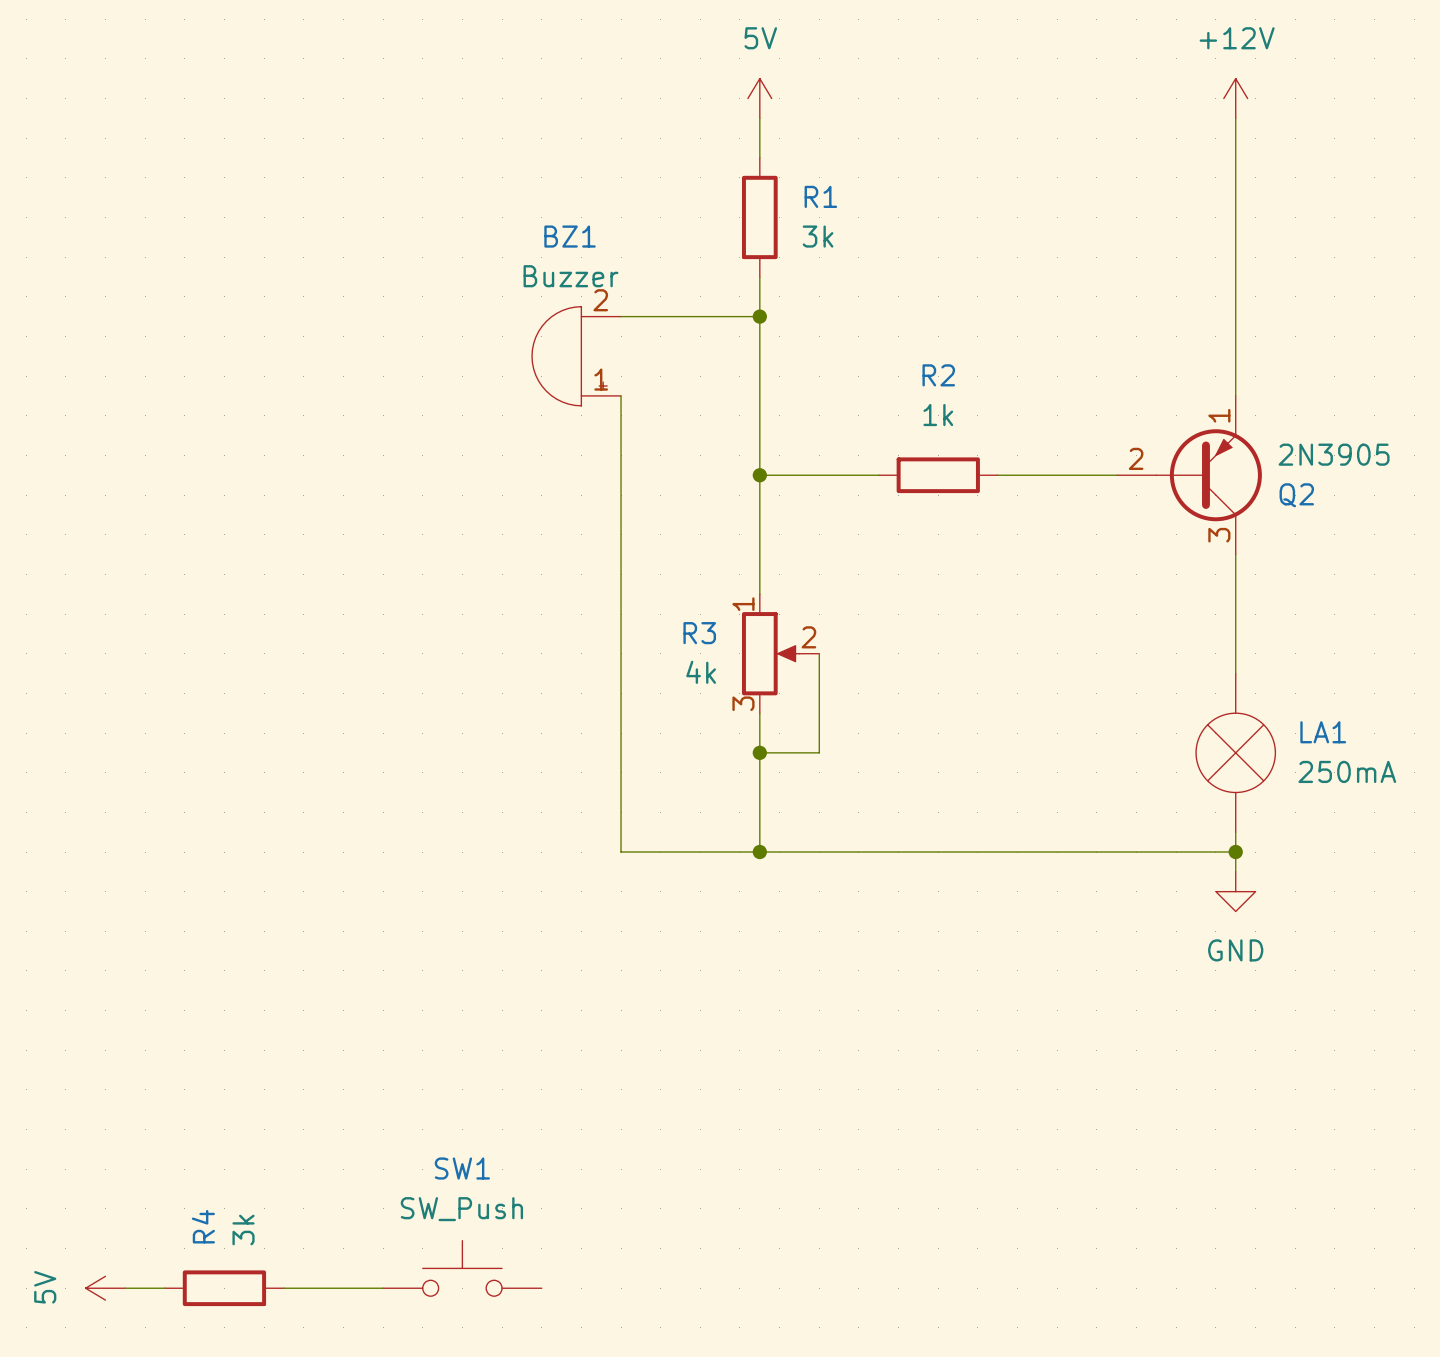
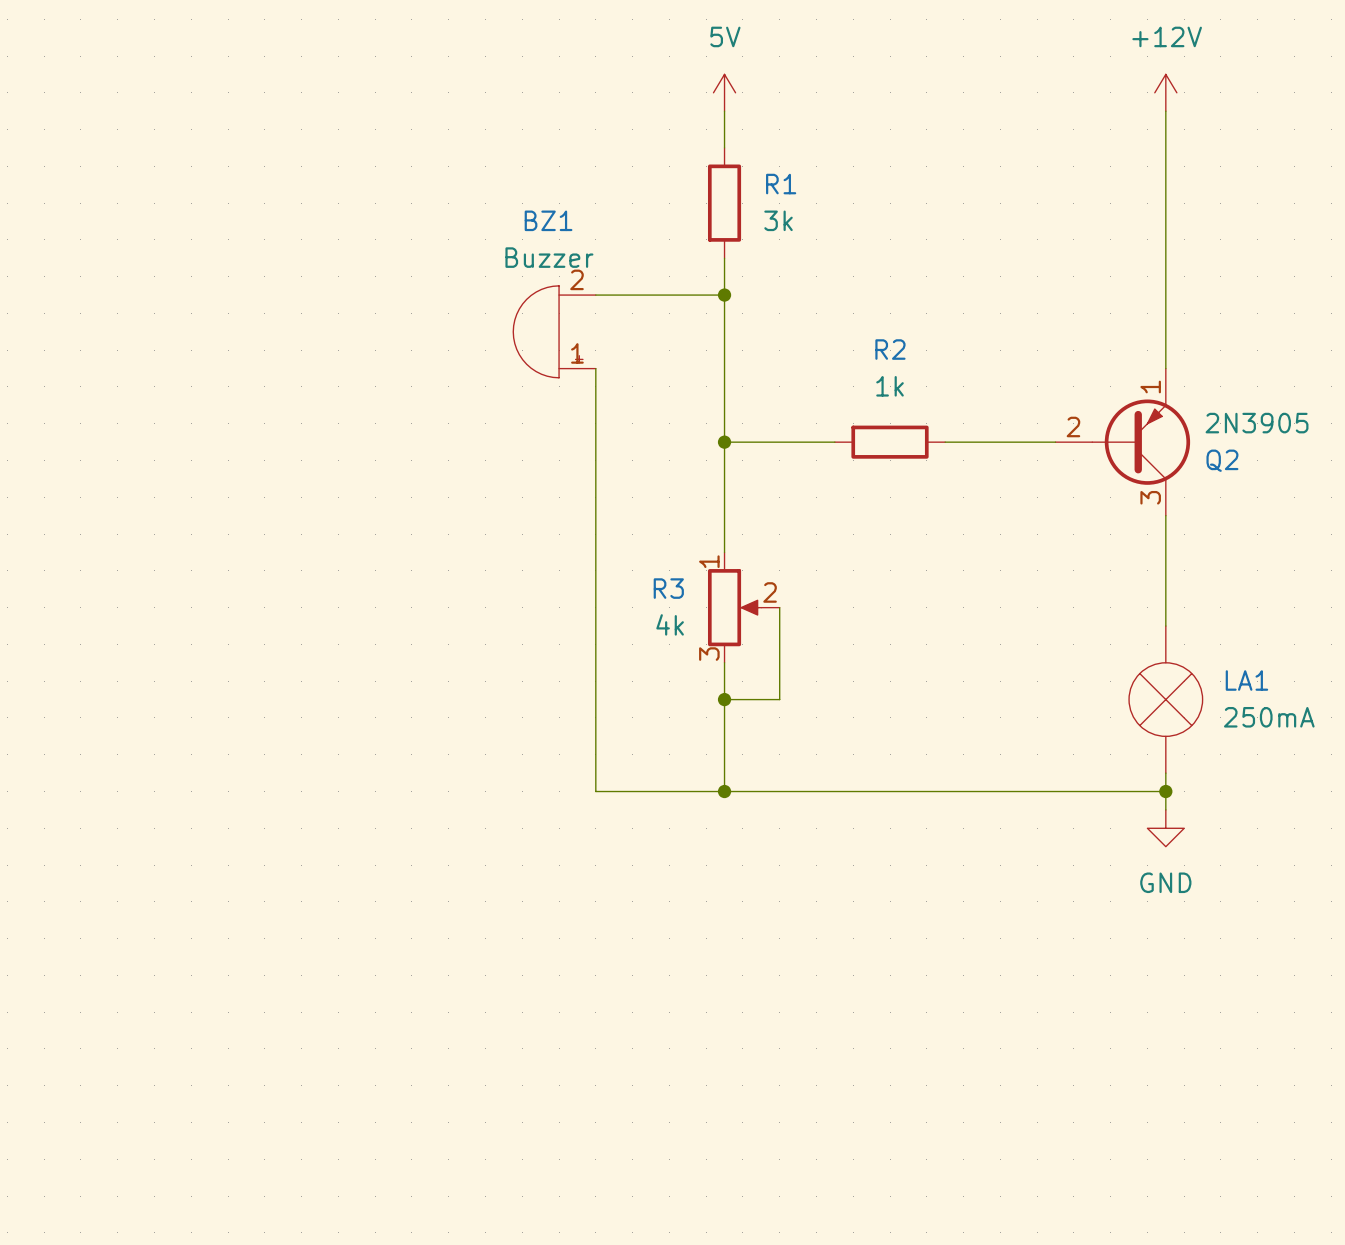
SW1: SW_Push (462, 1268) -> none
power symbol: 5V (105, 1288) -> none
wire: (125, 1288) (164, 1288) -> none
R4: 3k (224, 1288) -> none
wire: (283, 1288) (383, 1288) -> none

